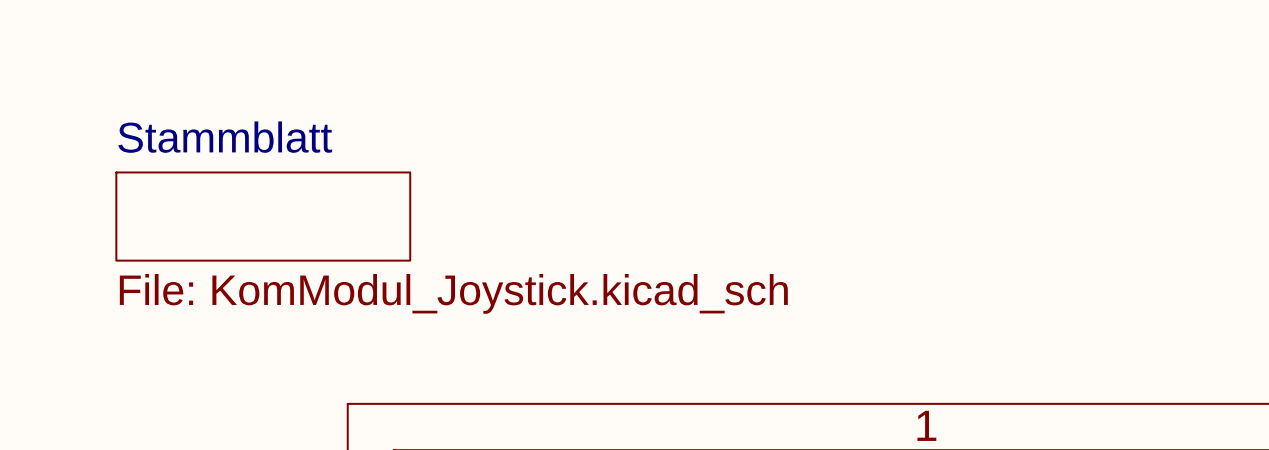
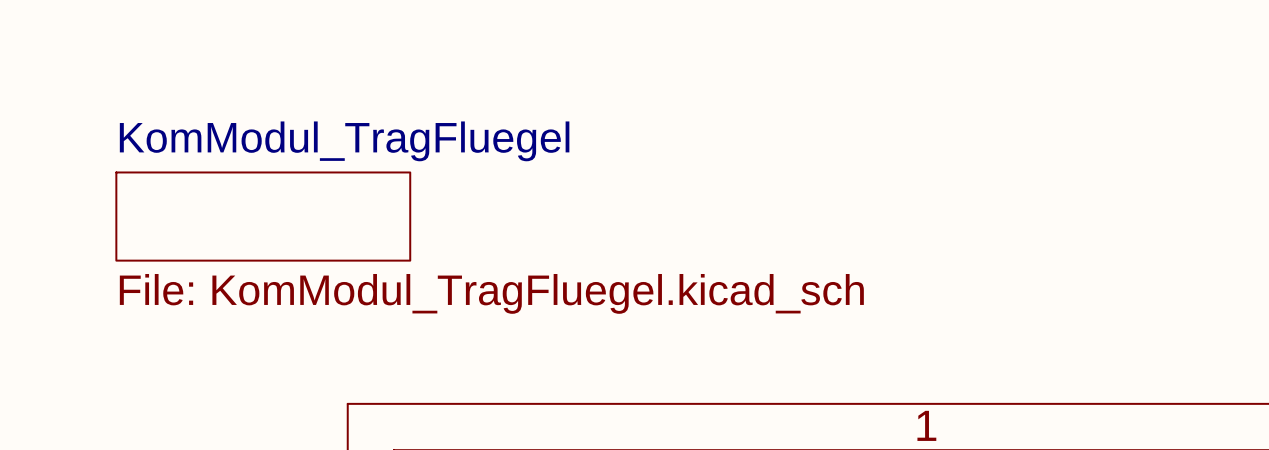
sheet Stammblatt name: Stammblatt (225, 137) -> KomModul_TragFluegel (344, 141)
sheet Stammblatt value: File: KomModul_Joystick.kicad_sch (453, 293) -> File: KomModul_TragFluegel.kicad_sch (491, 293)

